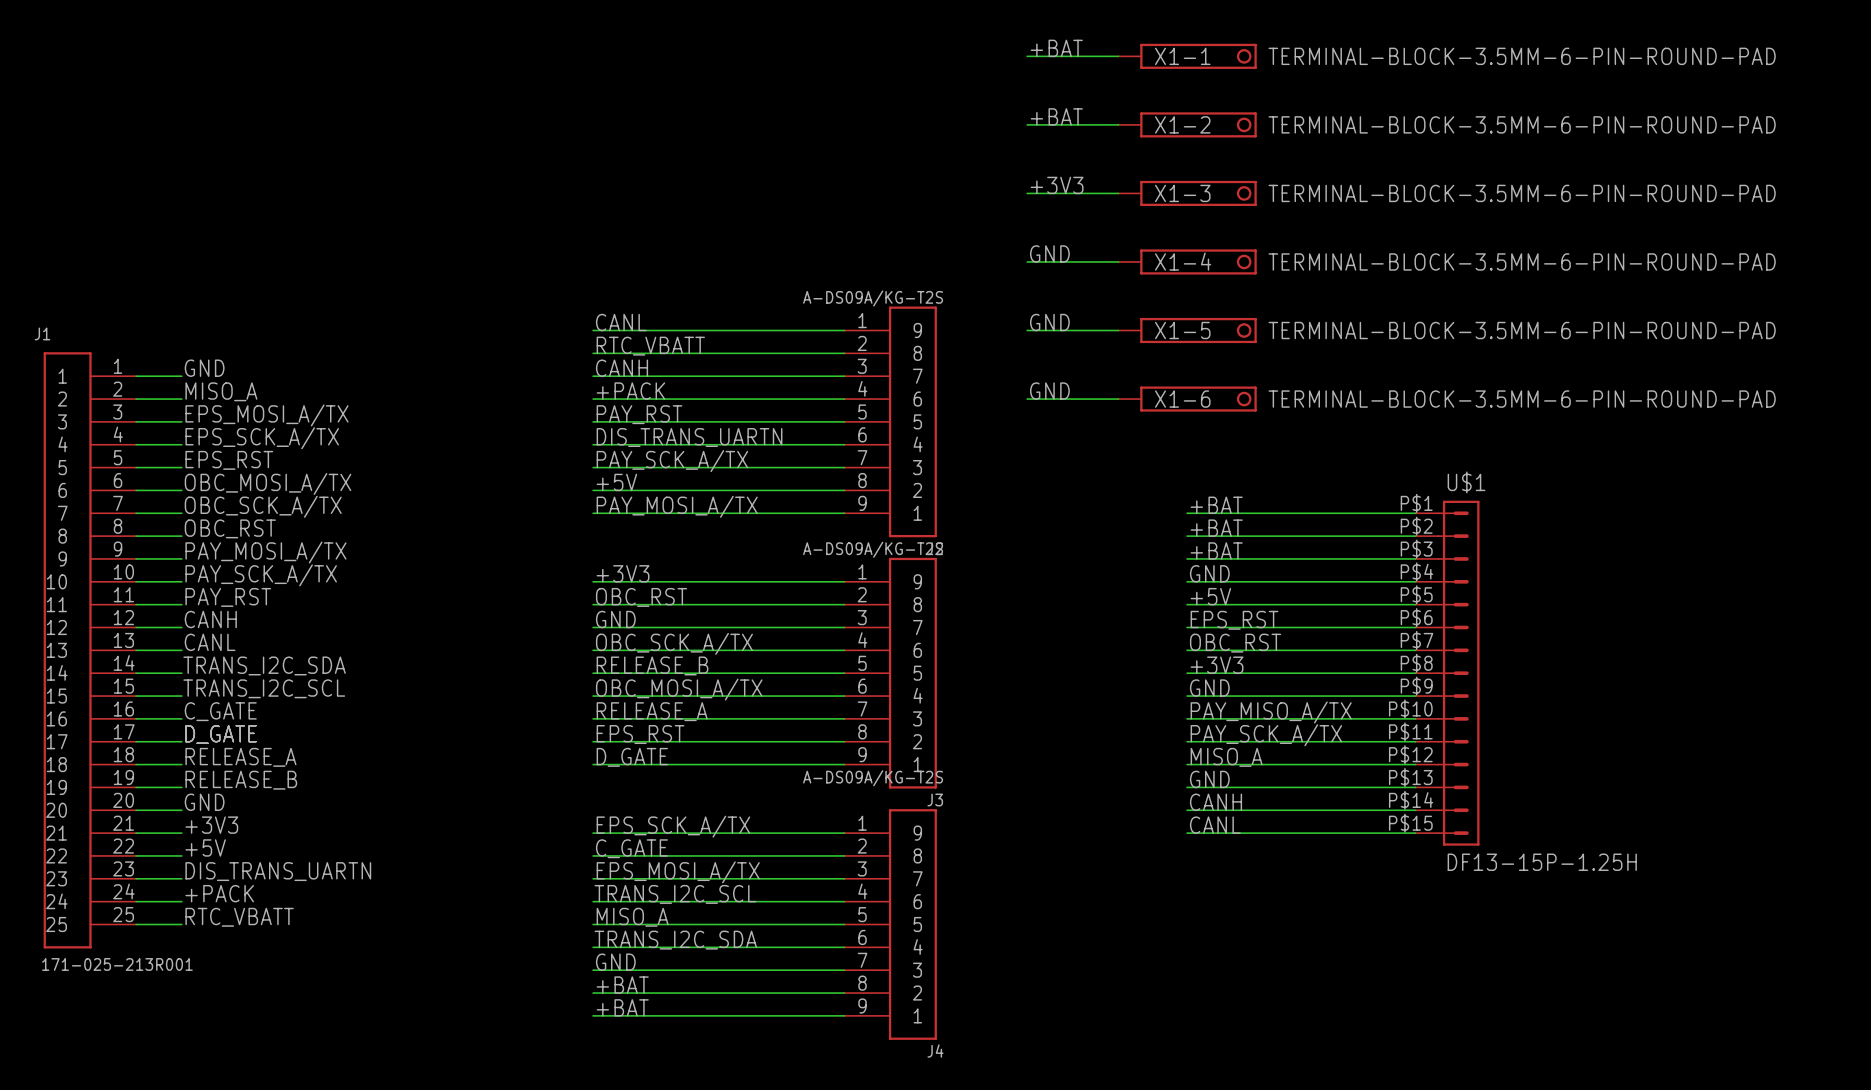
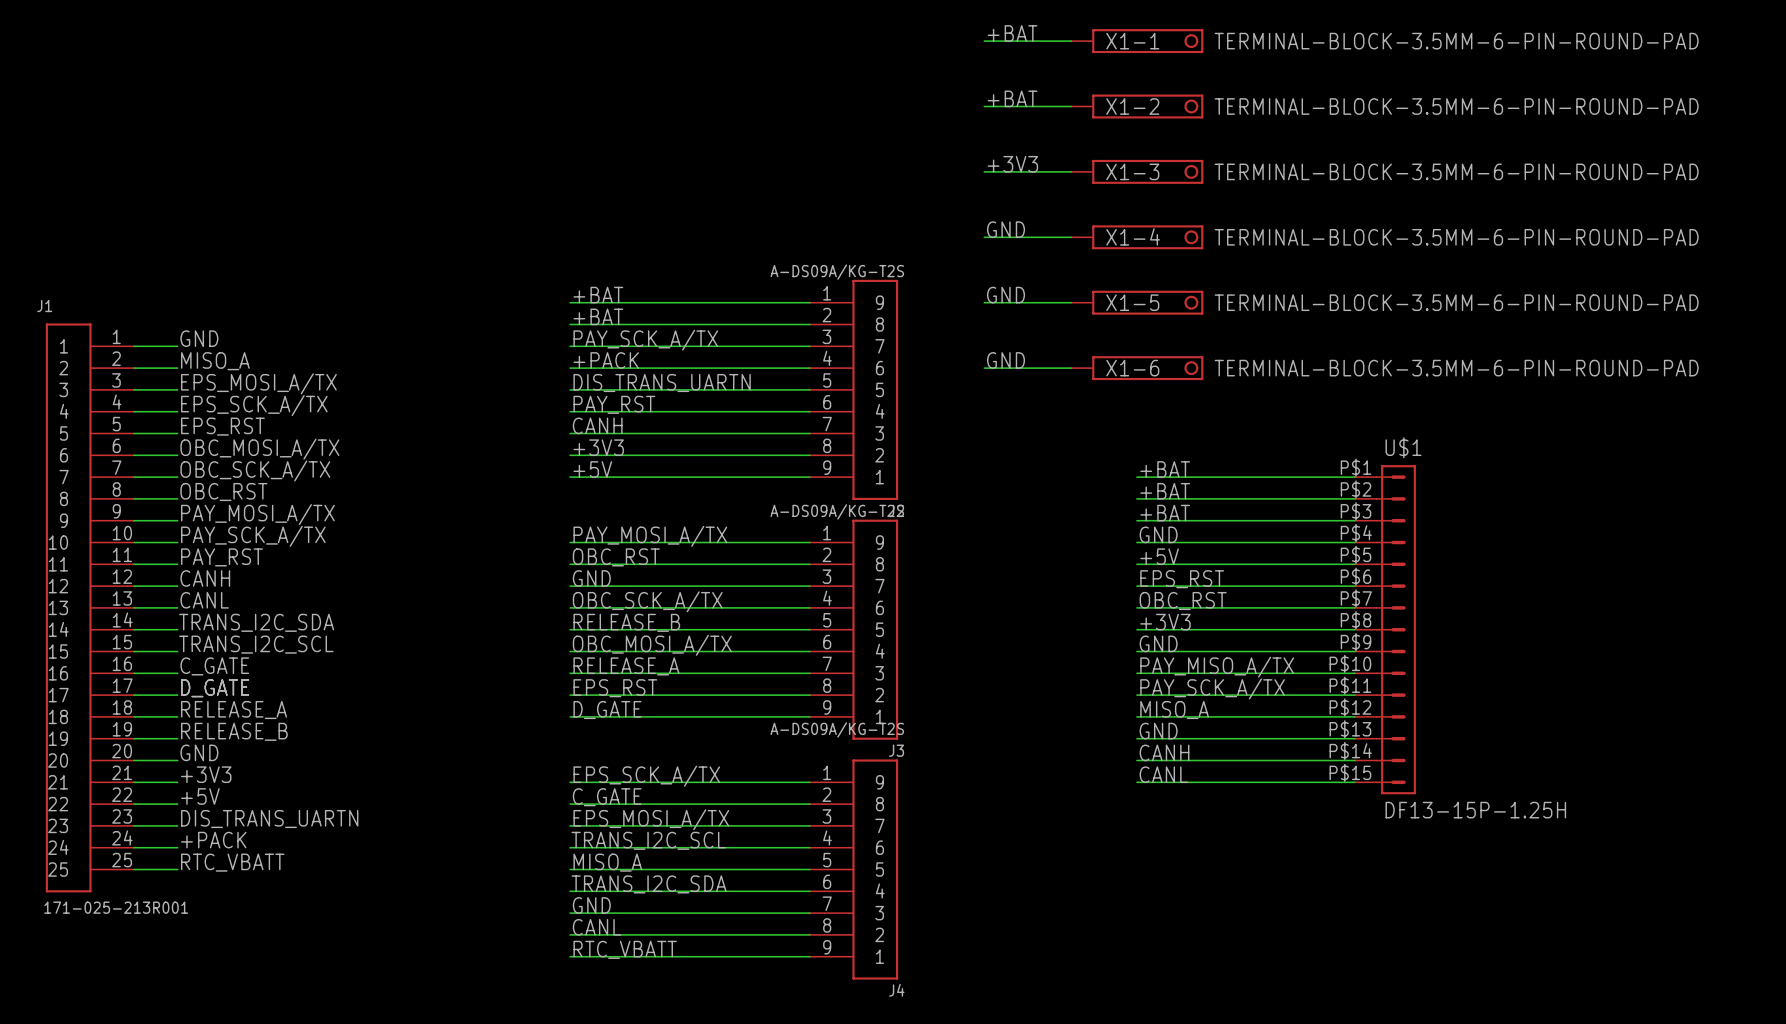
label: CANL (621, 322) -> +BAT (598, 295)
label: RTC_VBATT (650, 346) -> +BAT (598, 316)
label: CANH (622, 368) -> PAY_SCK_A/TX (645, 340)
label: PAY_RST (639, 414) -> DIS_TRANS_UARTN (662, 383)
label: DIS_TRANS_UARTN (689, 437) -> PAY_RST (614, 404)
label: PAY_SCK_A/TX (672, 461) -> CANH (597, 425)
label: +5V (616, 482) -> +3V3 (598, 447)
label: PAY_MOSI_A/TX (677, 506) -> +5V (592, 469)
label: +3V3 (623, 573) -> PAY_MOSI_A/TX (650, 536)
label: +BAT (622, 985) -> CANL (597, 927)
label: +BAT (622, 1007) -> RTC_VBATT (625, 949)

